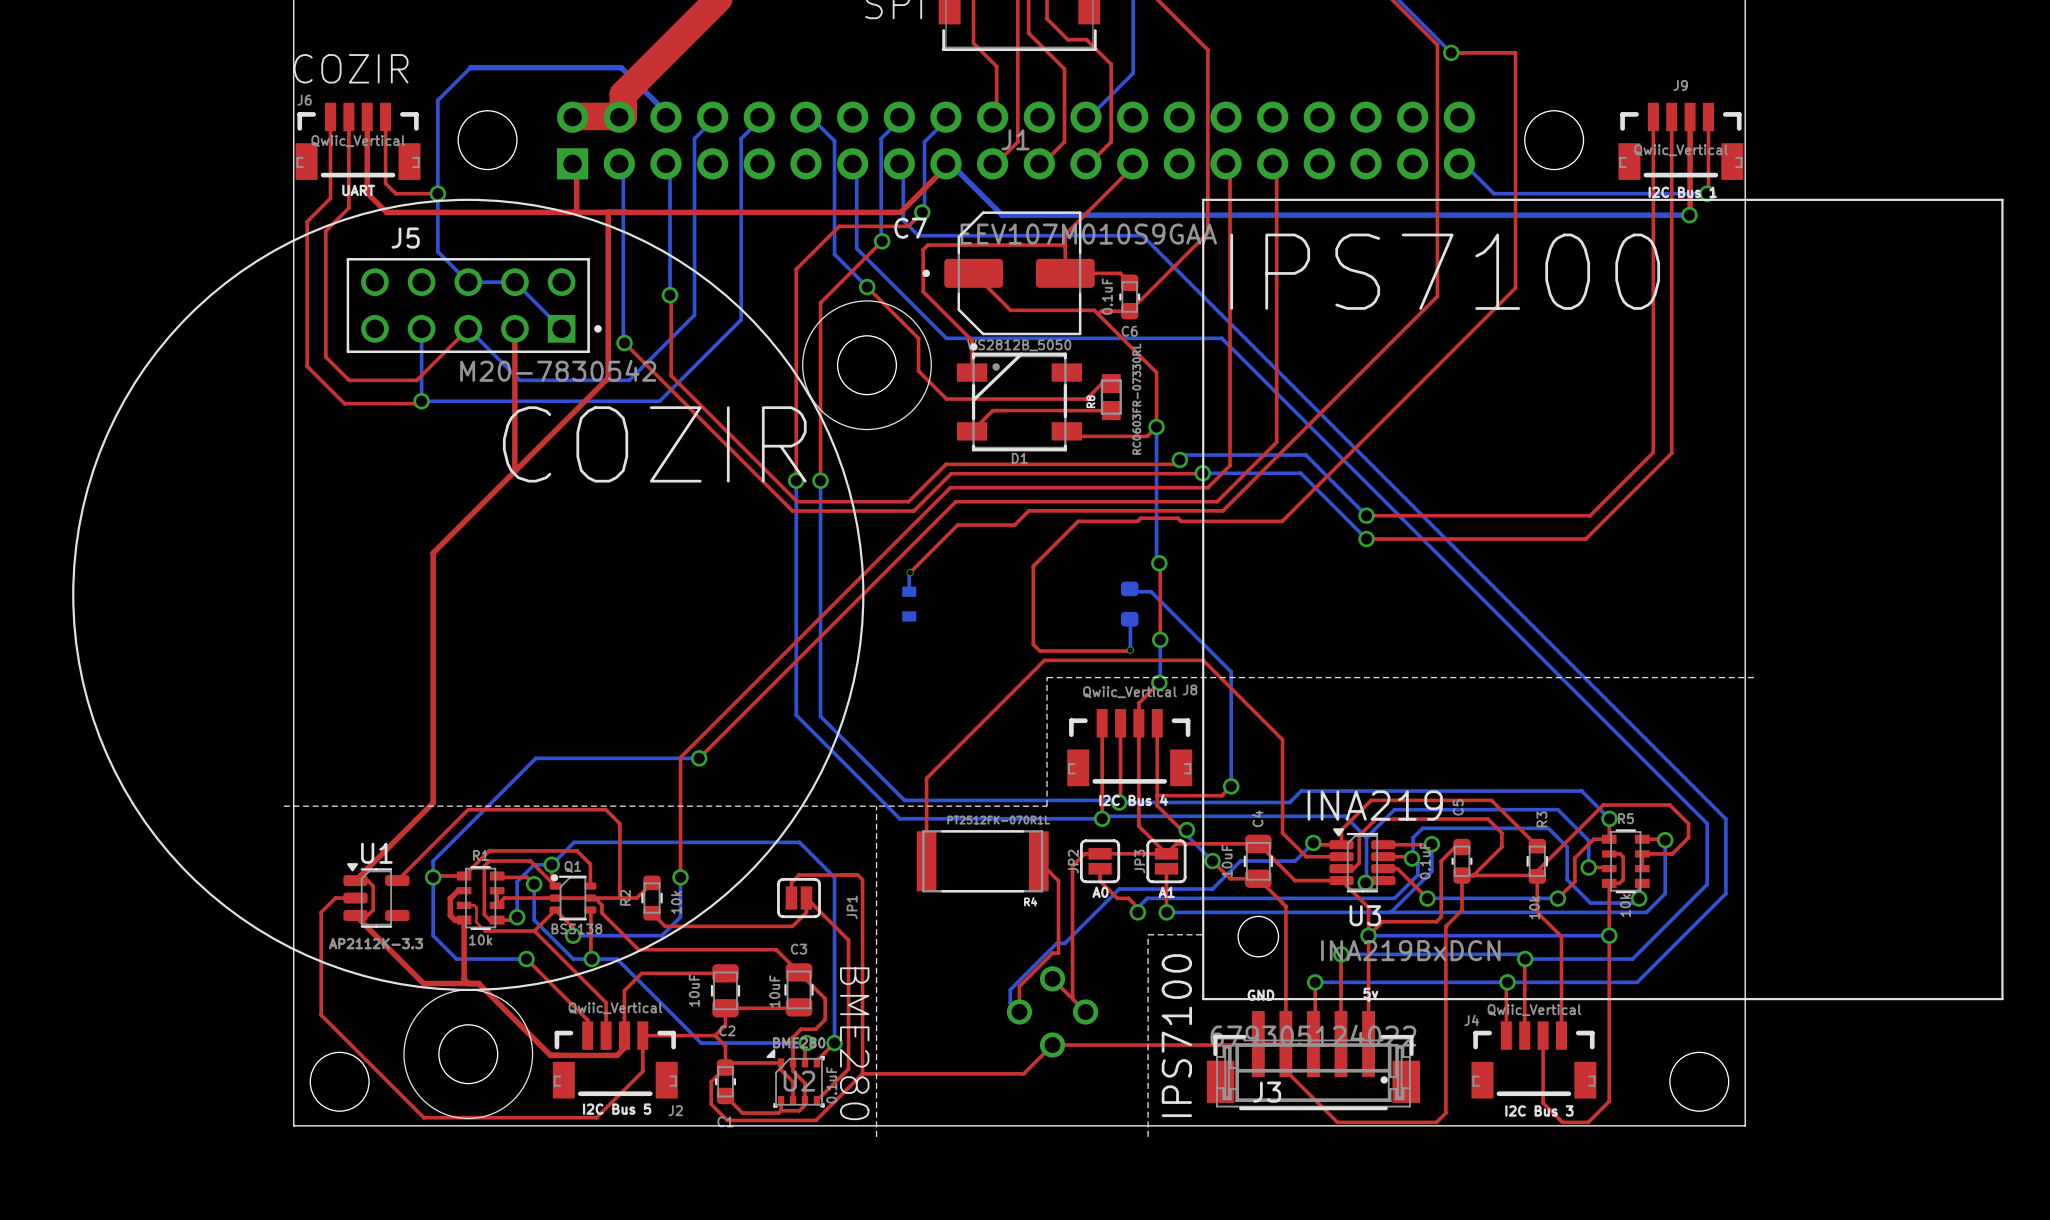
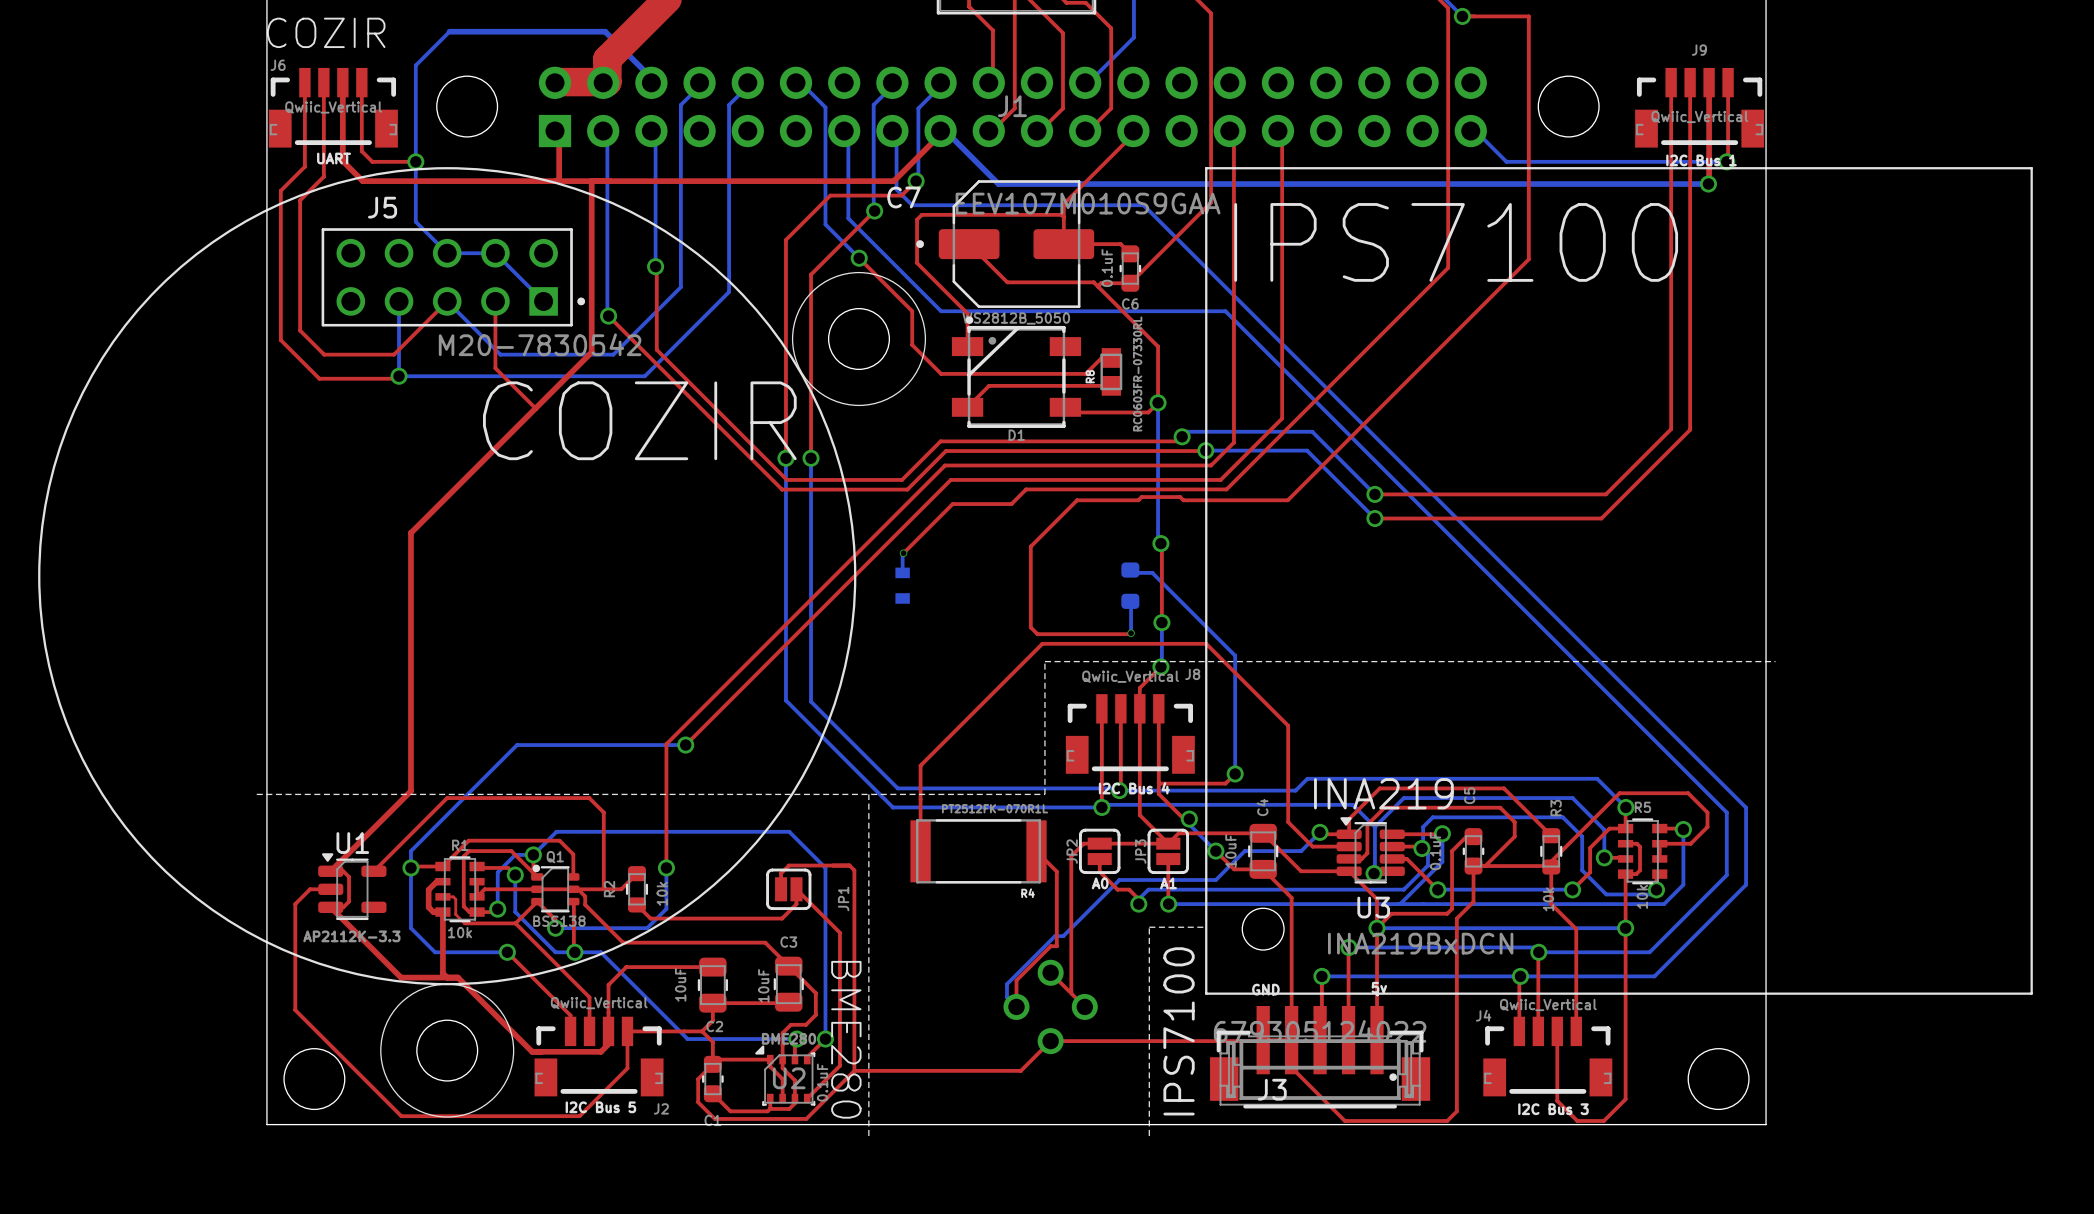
top track: none -> (495, 301) (495, 368) (535, 408)
top track: (514, 331) (514, 471) -> none

